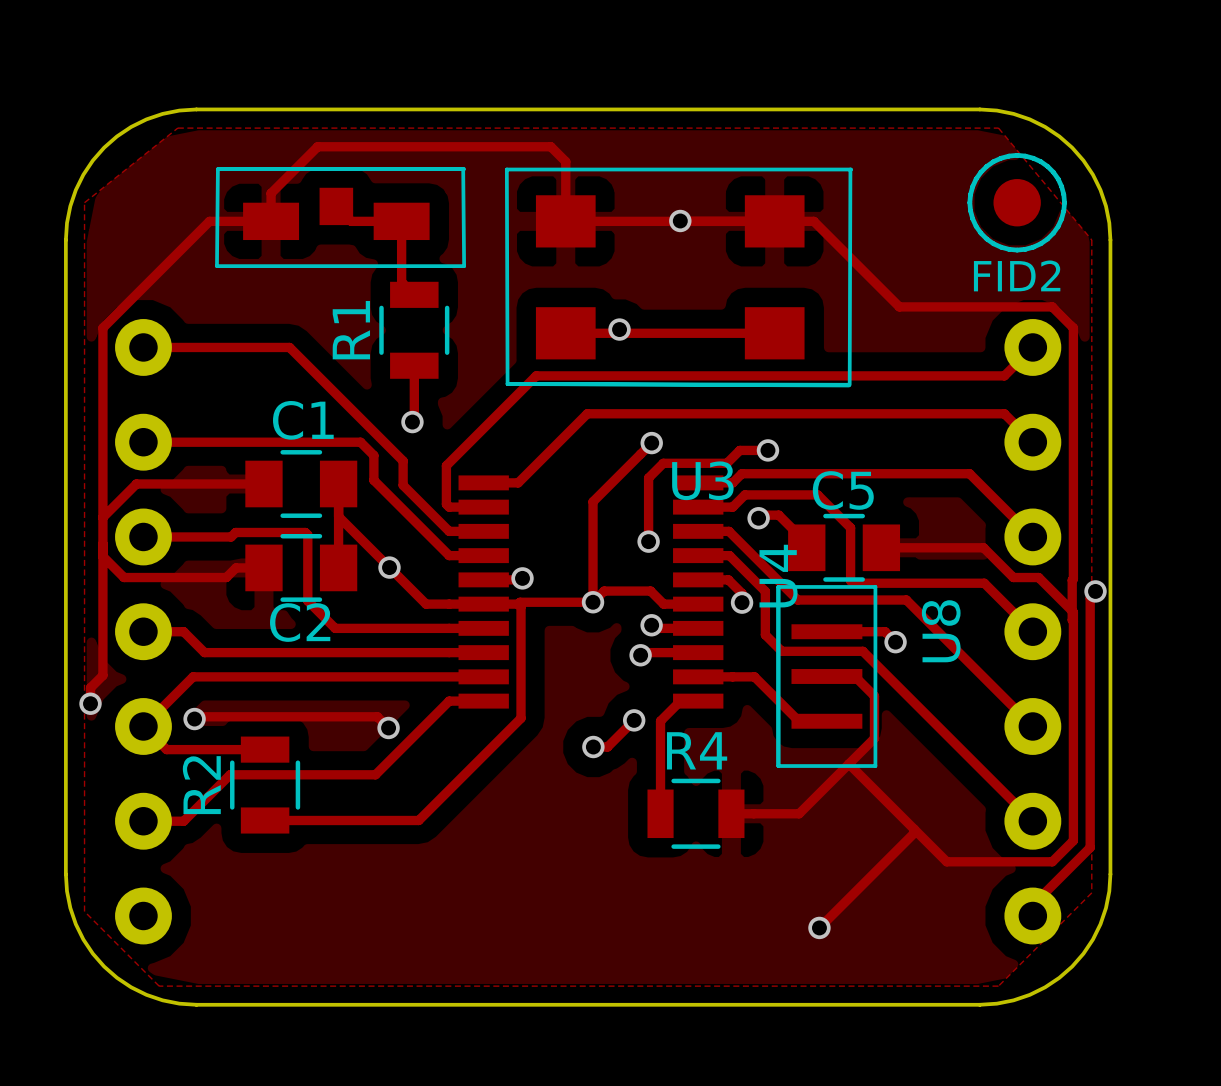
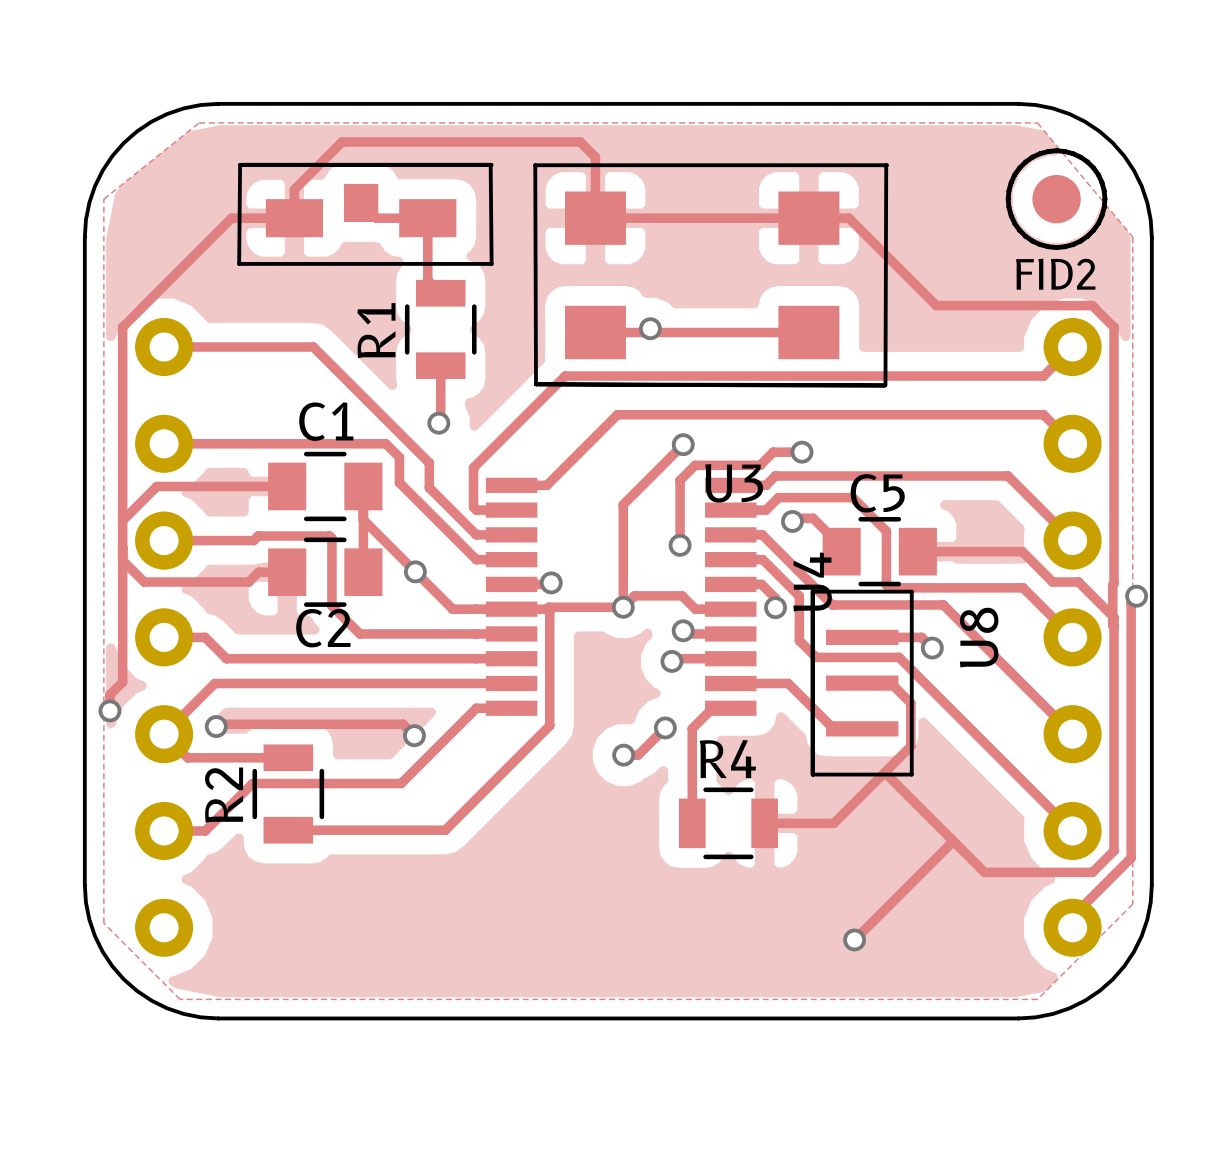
via: (680, 220) -> none

